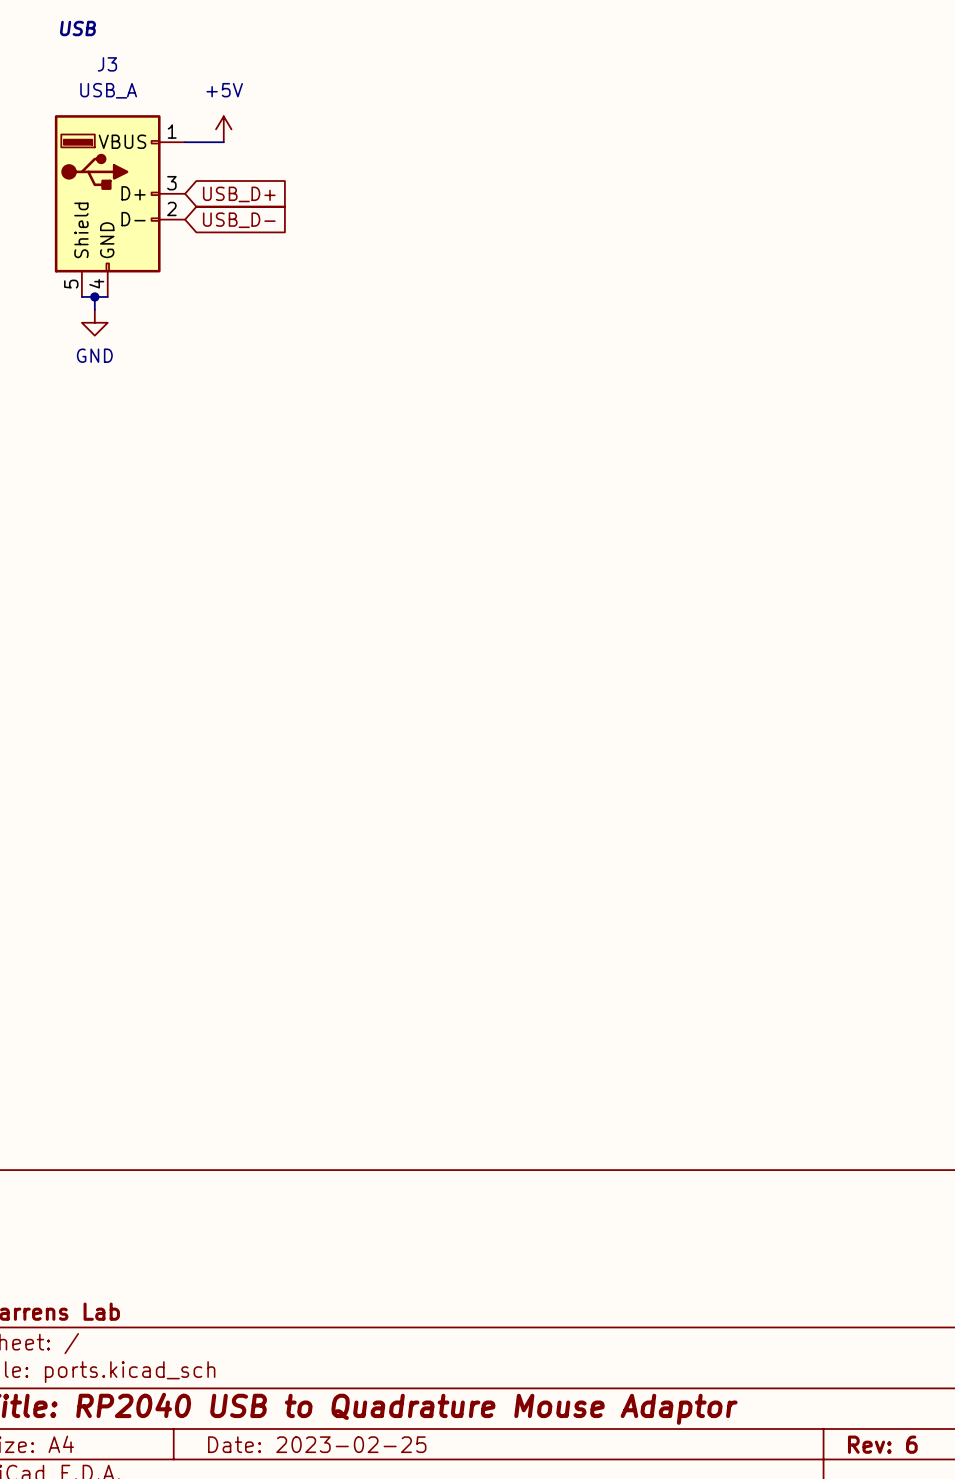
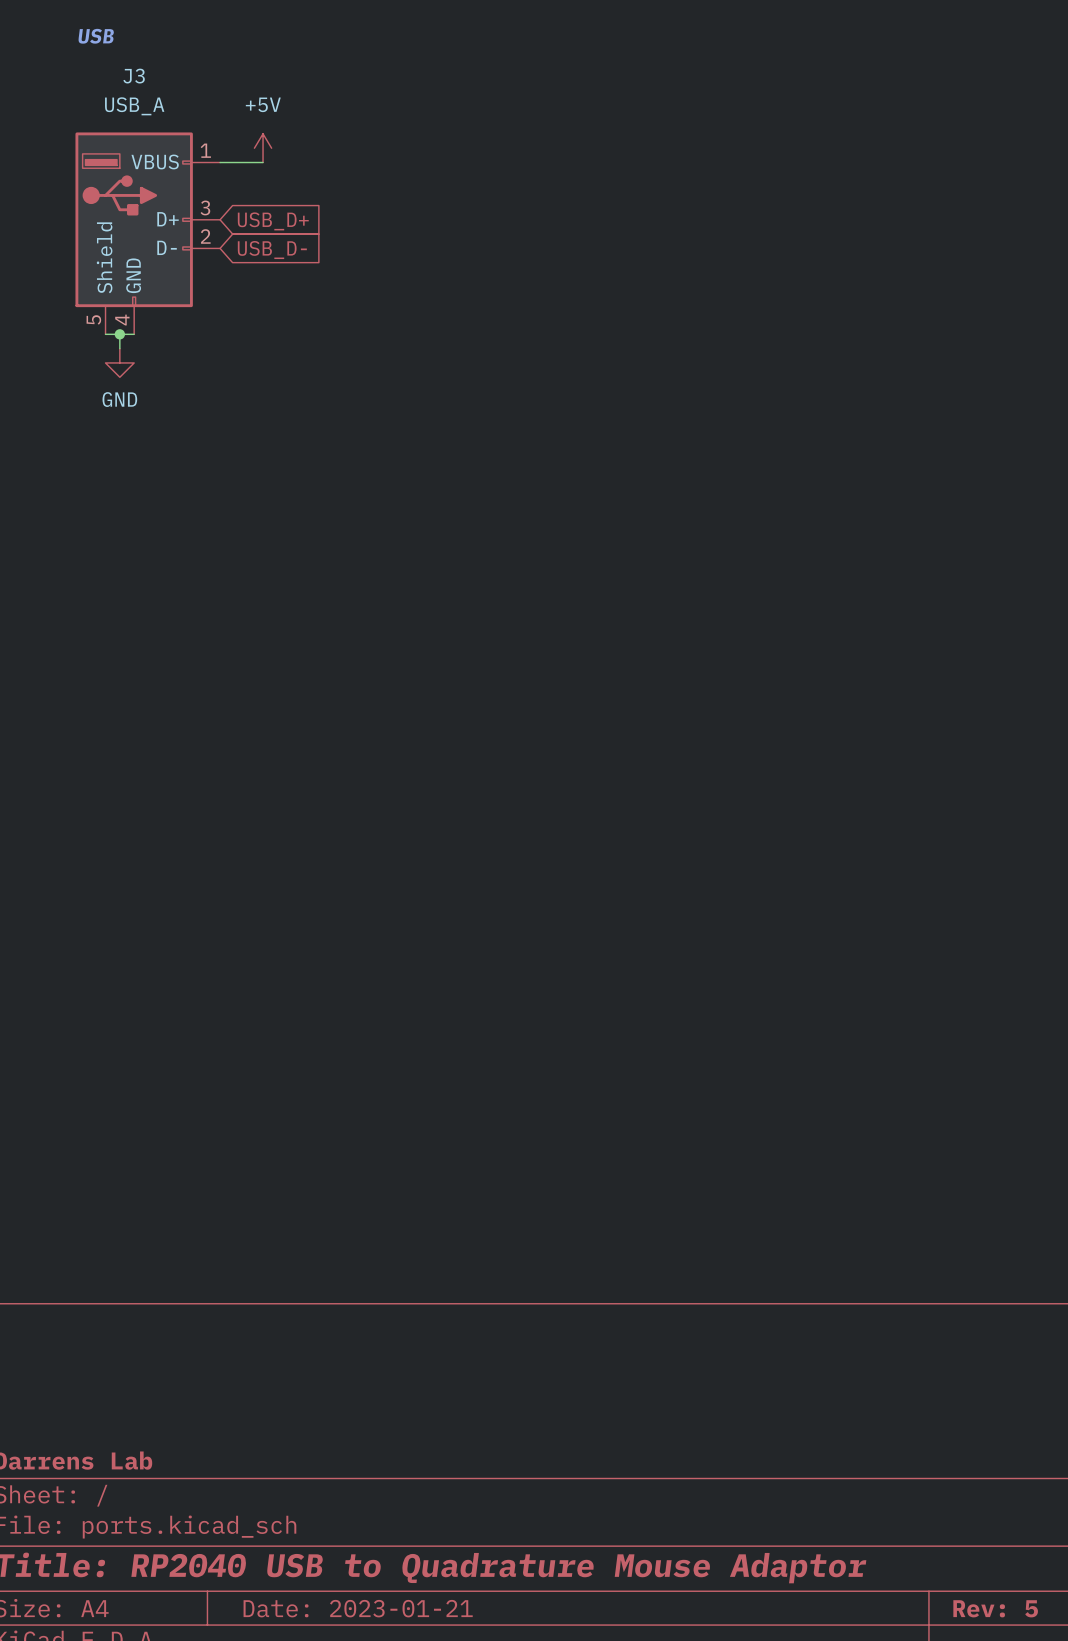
title block: Date: 2023-02-25 (317, 1444) -> Date: 2023-01-21 (358, 1608)
title block: Rev: 6 (882, 1444) -> Rev: 5 (995, 1608)

